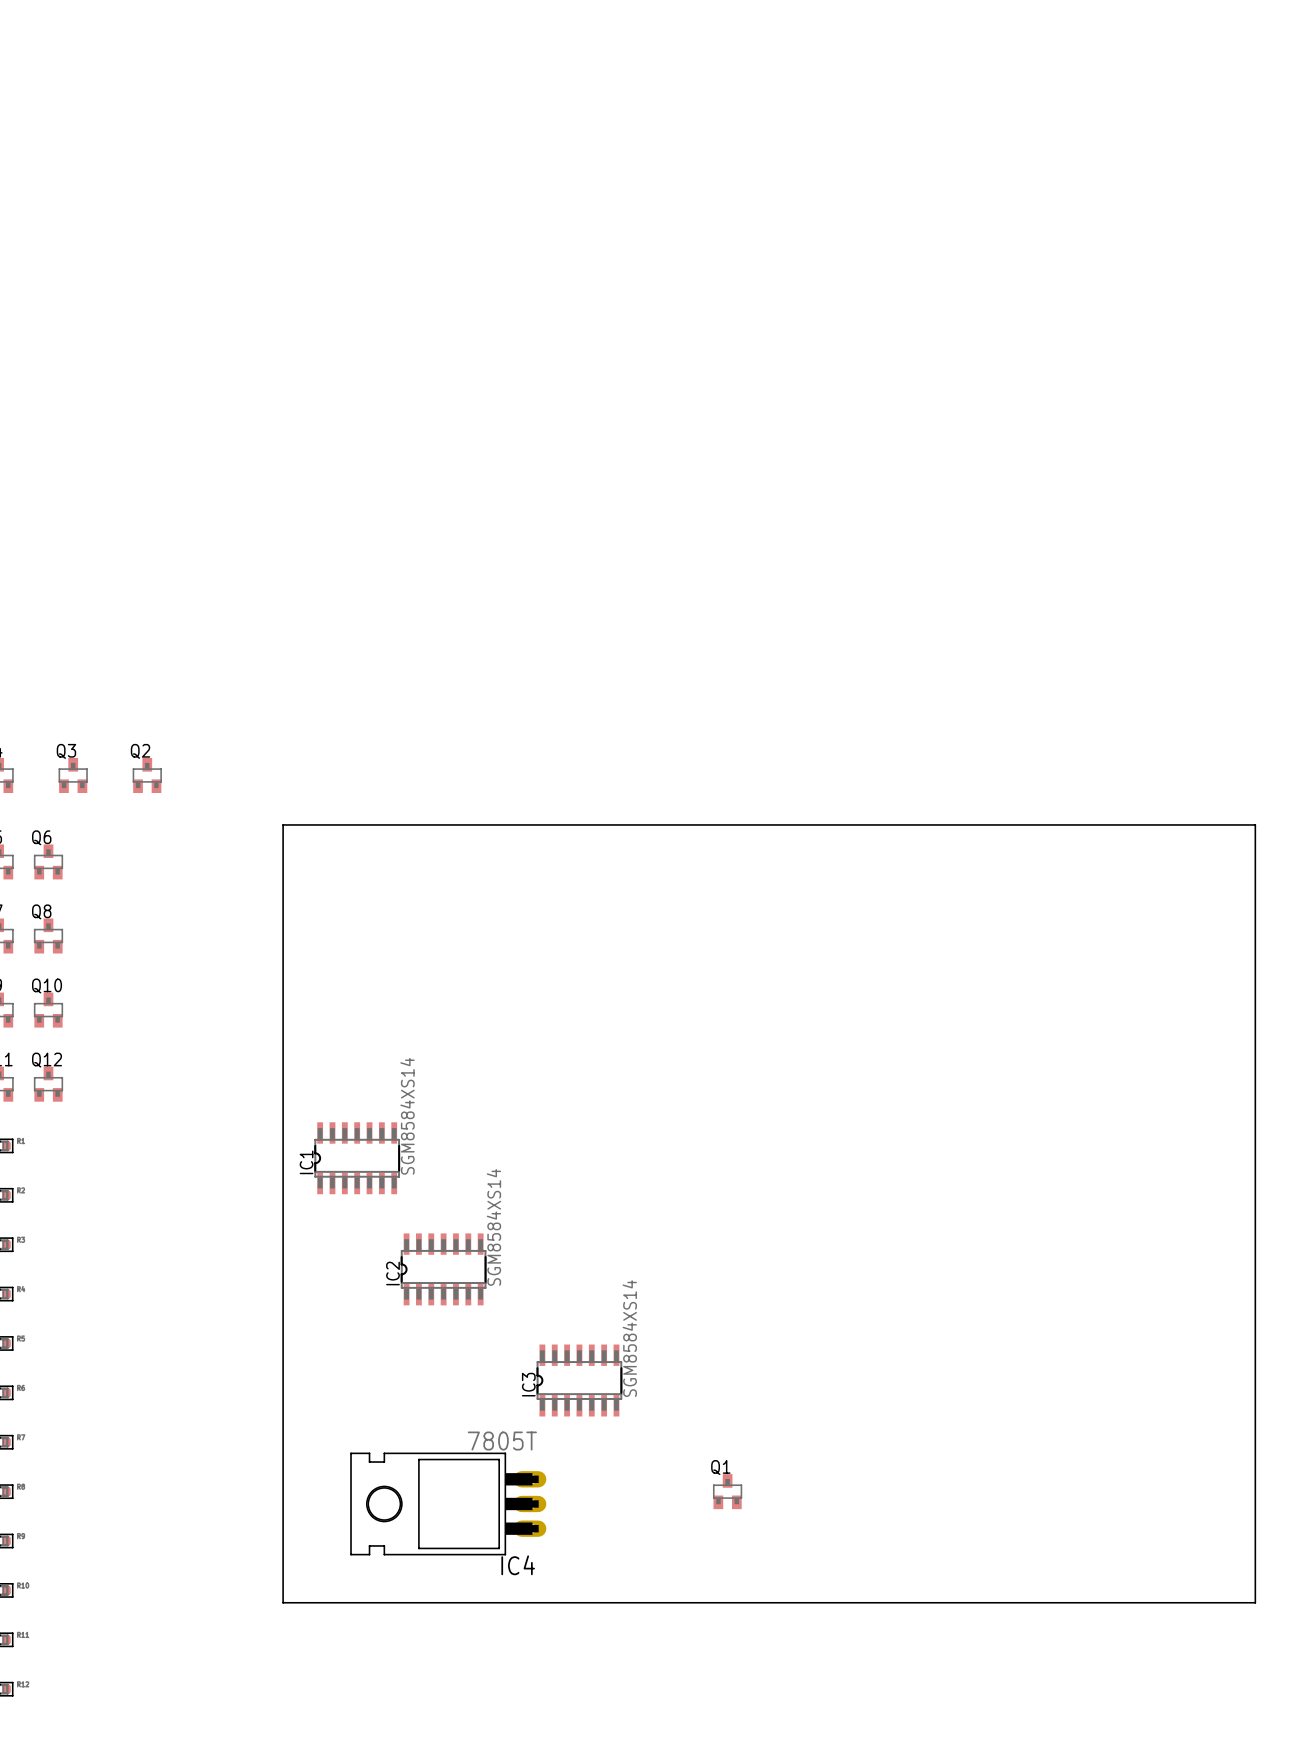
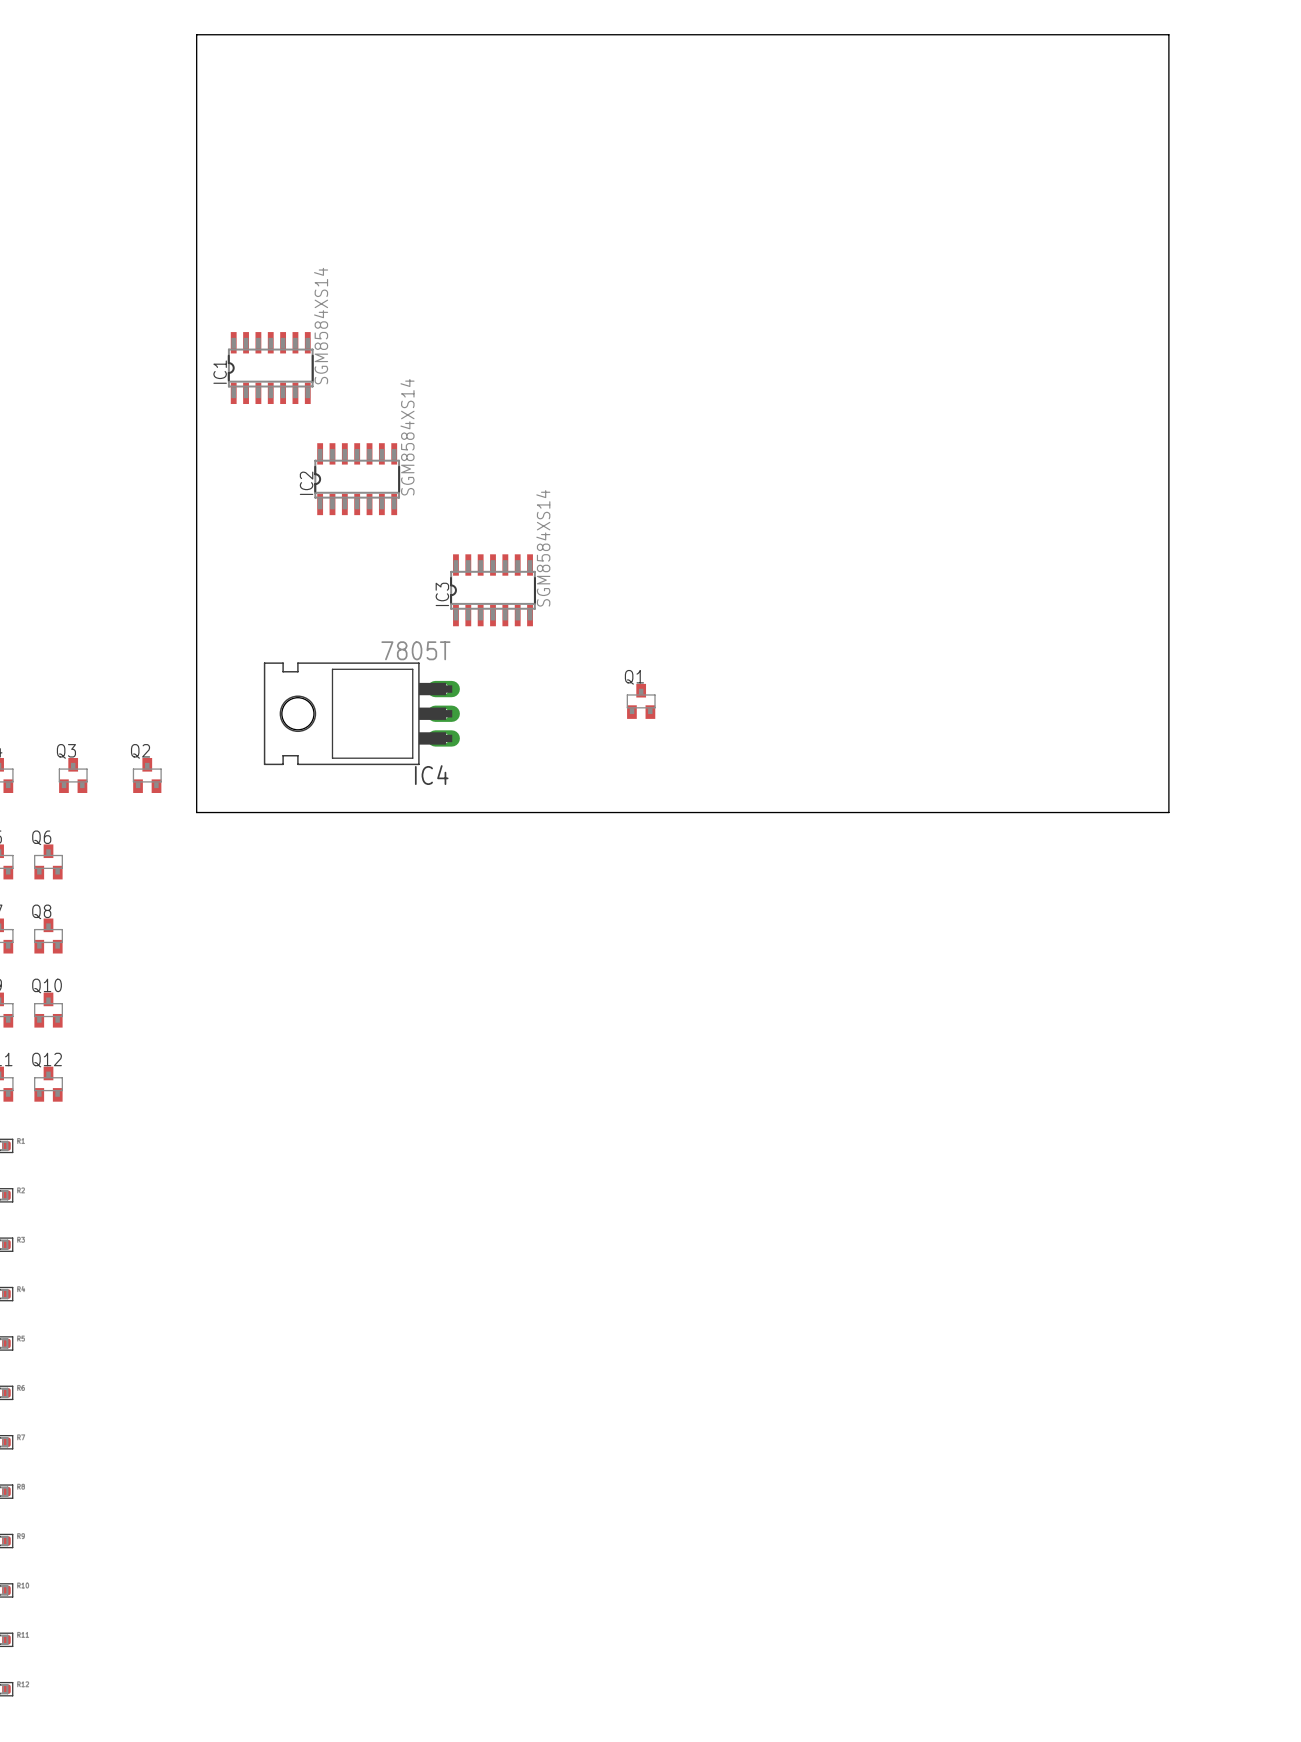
board edge: none -> (196, 34) (1168, 34) (1168, 812) (196, 812) (196, 34)
board edge: (283, 824) (1255, 824) (1255, 1602) (283, 1602) (283, 824) -> none
IC1 position: (357, 1158) -> (270, 368)
IC2 position: (443, 1269) -> (357, 479)
IC3 position: (579, 1380) -> (493, 590)
Q1 position: (727, 1491) -> (641, 701)
IC4 position: (448, 1503) -> (361, 713)

